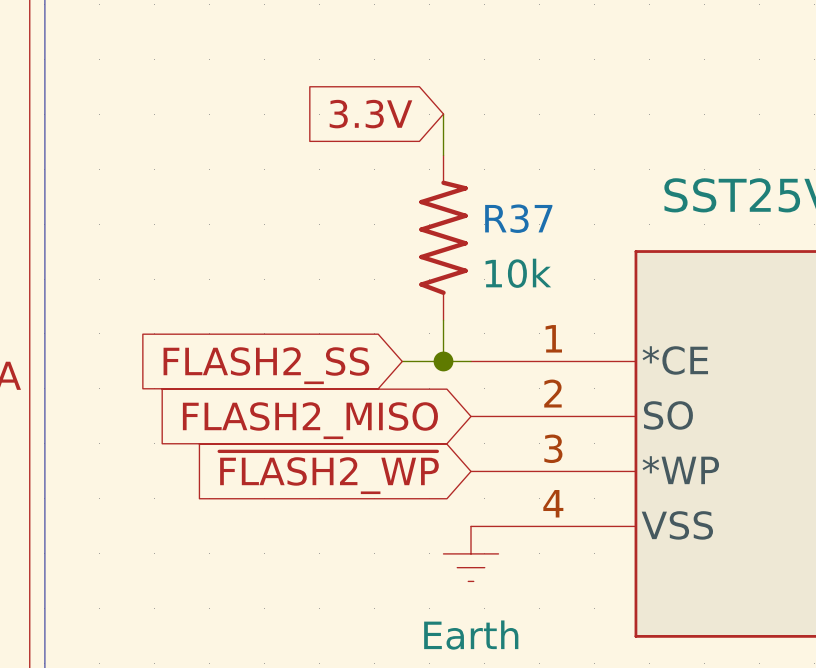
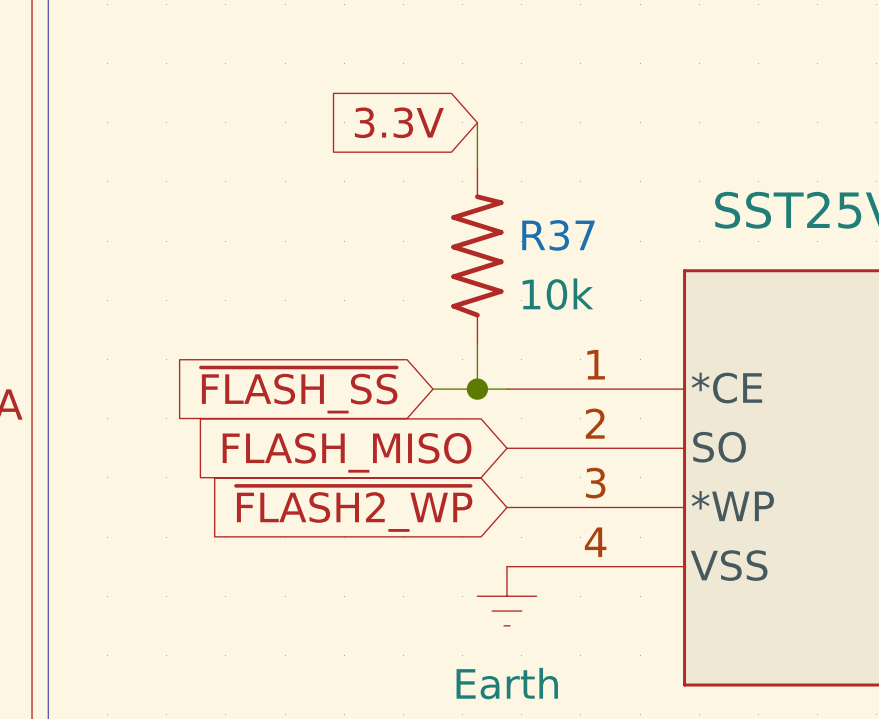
global label: FLASH2_SS (266, 365) -> ~{FLASH_SS} (299, 390)
global label: FLASH2_MISO (310, 420) -> FLASH_MISO (347, 452)

